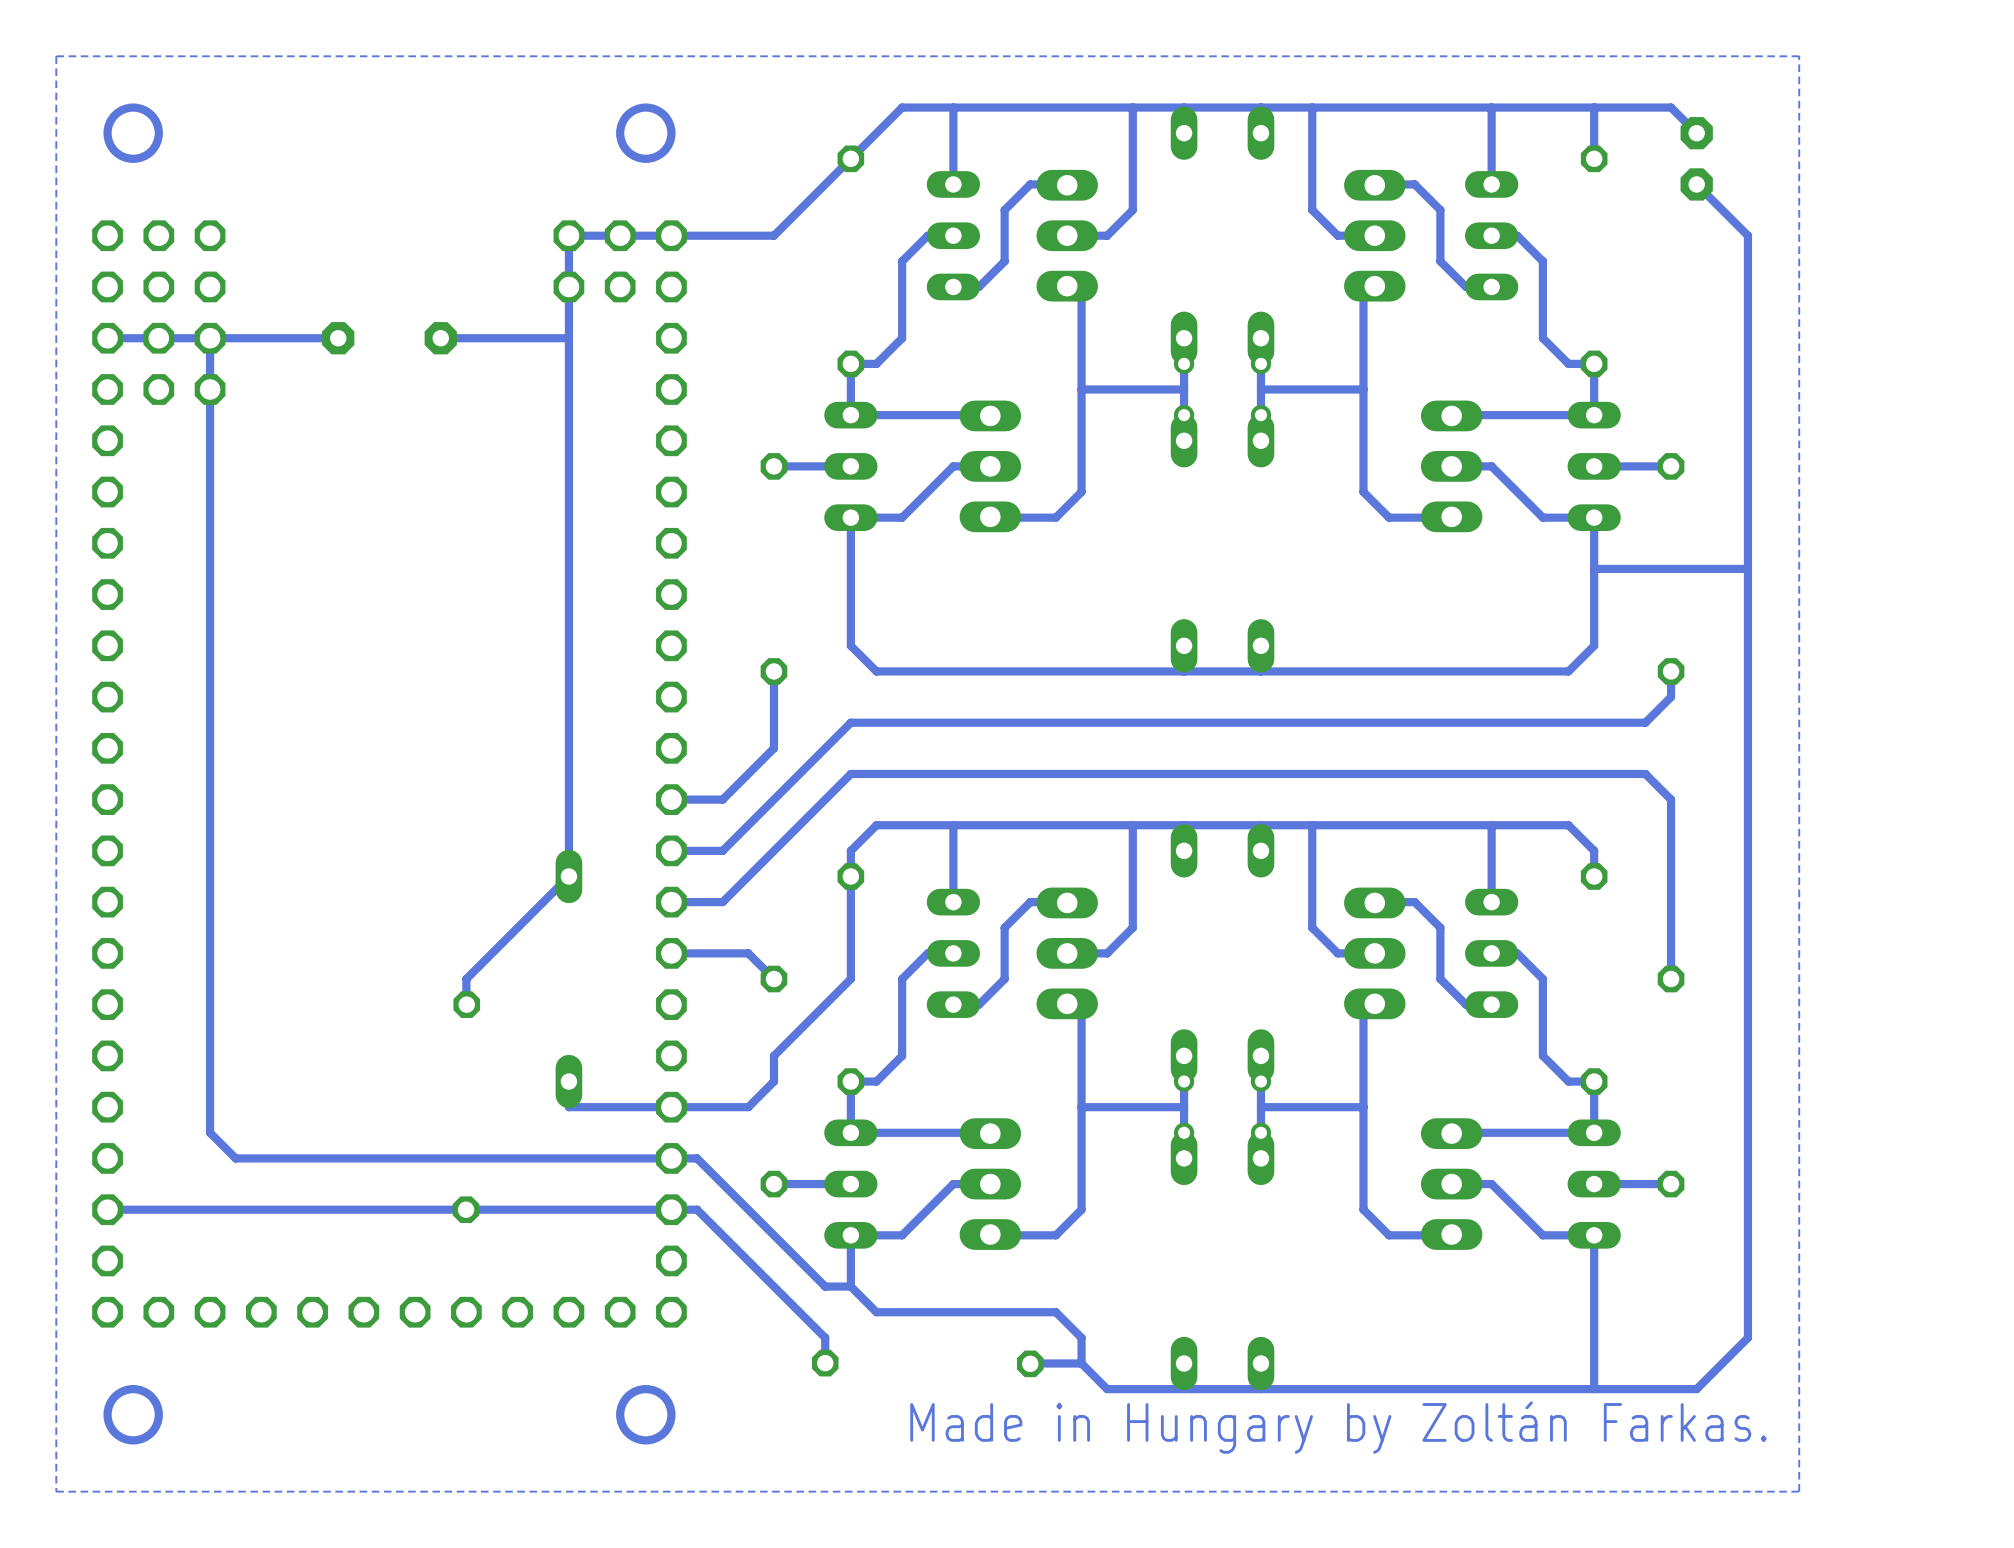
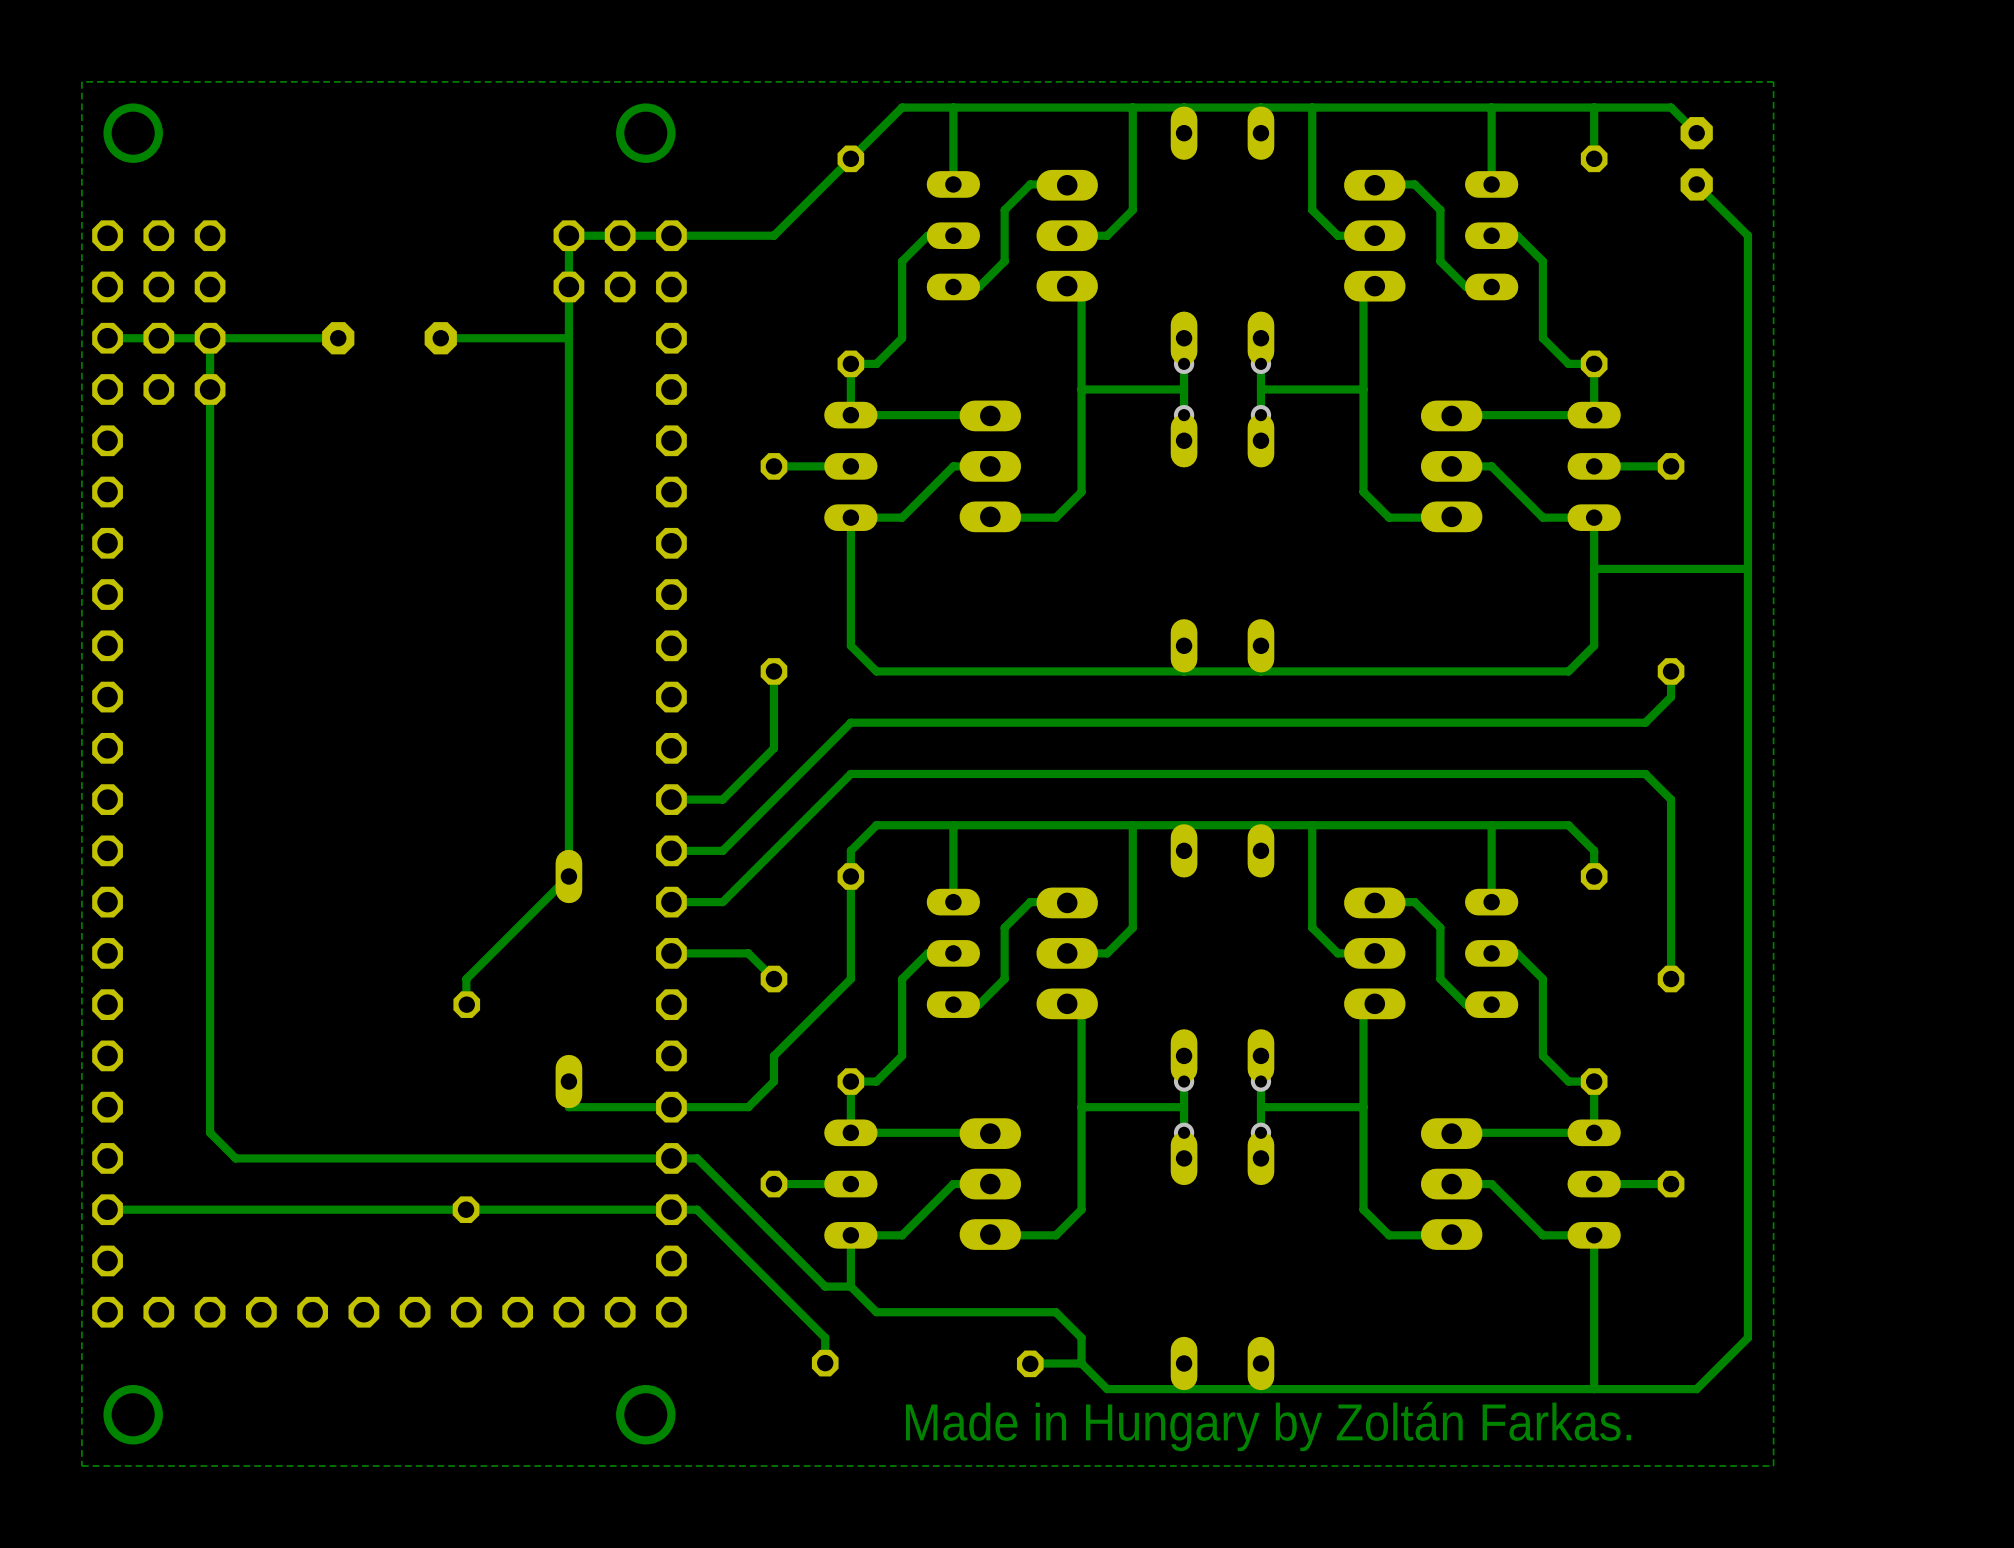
bottom zone outline: (1799, 56) (1799, 1491) (56, 1491) (56, 56) (1799, 56) -> (1773, 81) (1773, 1466) (81, 1466) (81, 81) (1773, 81)

